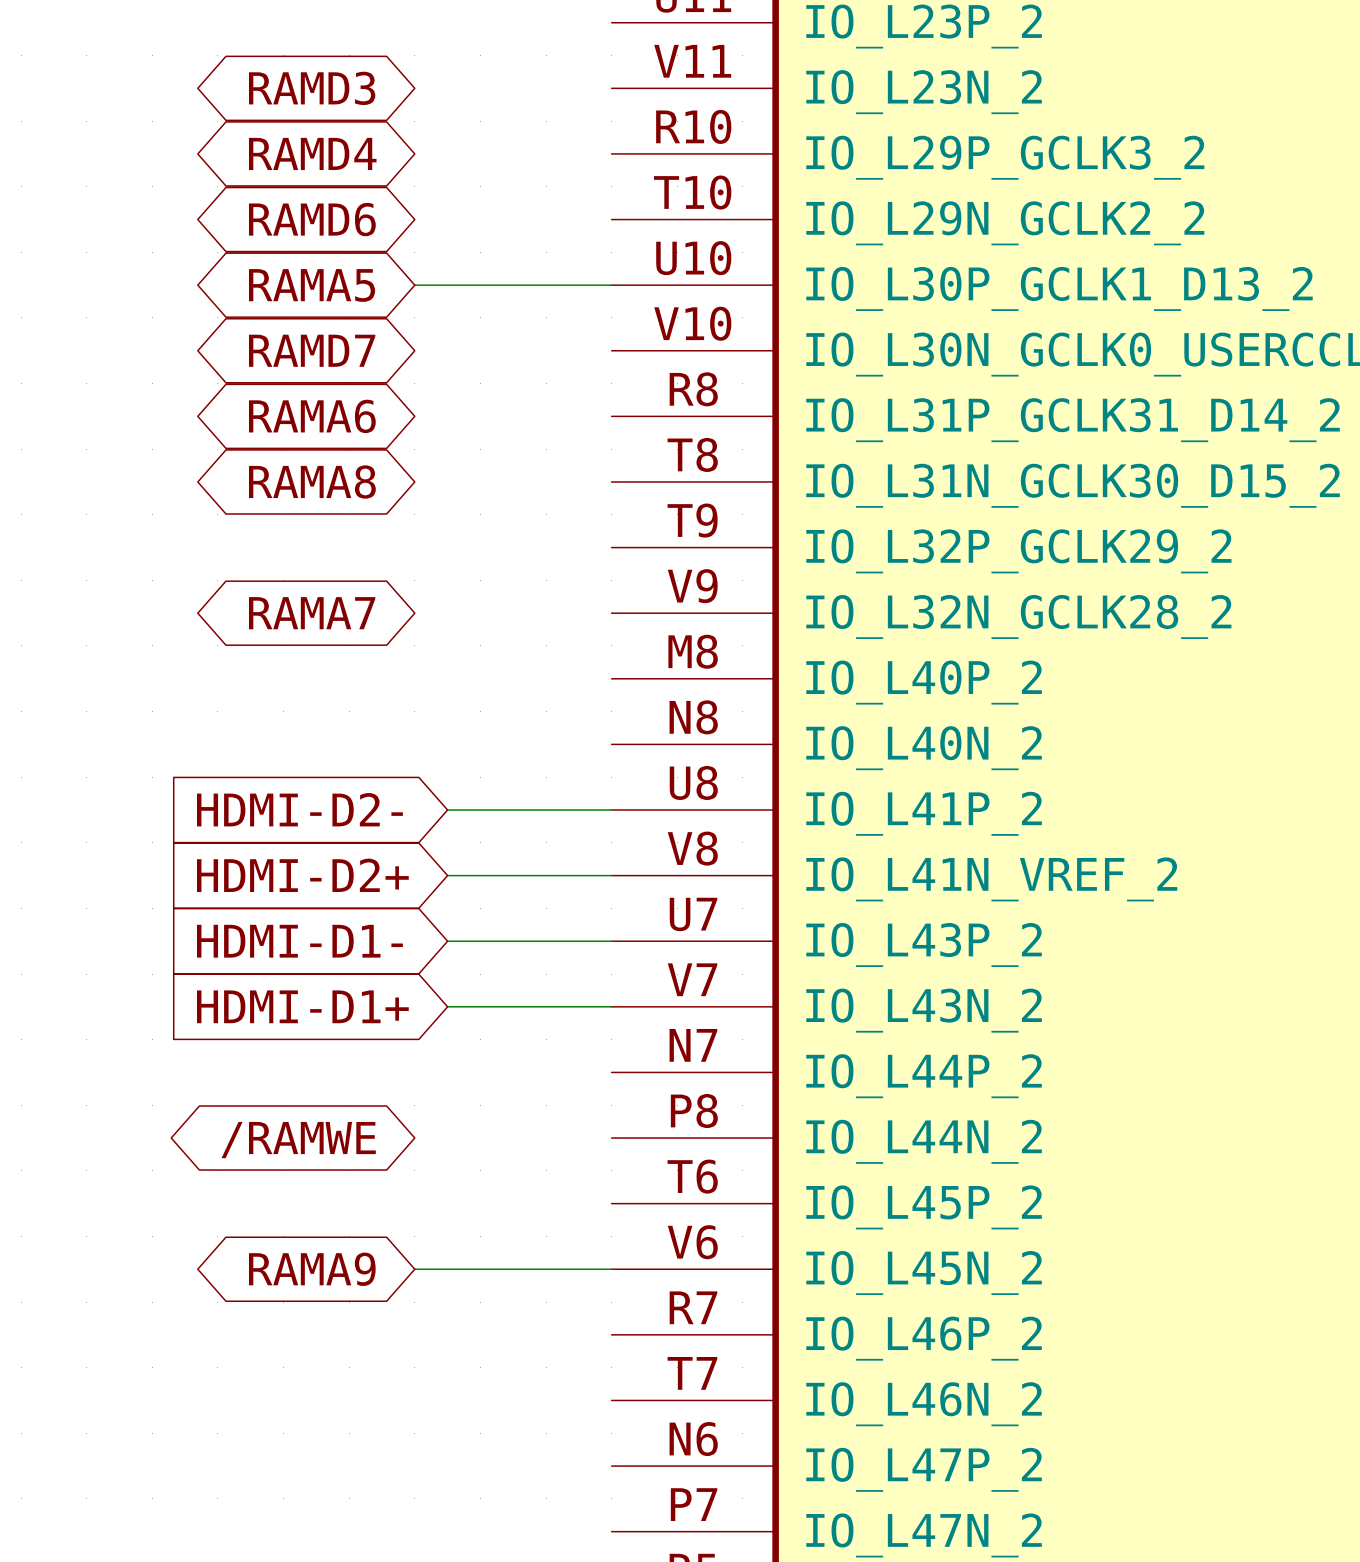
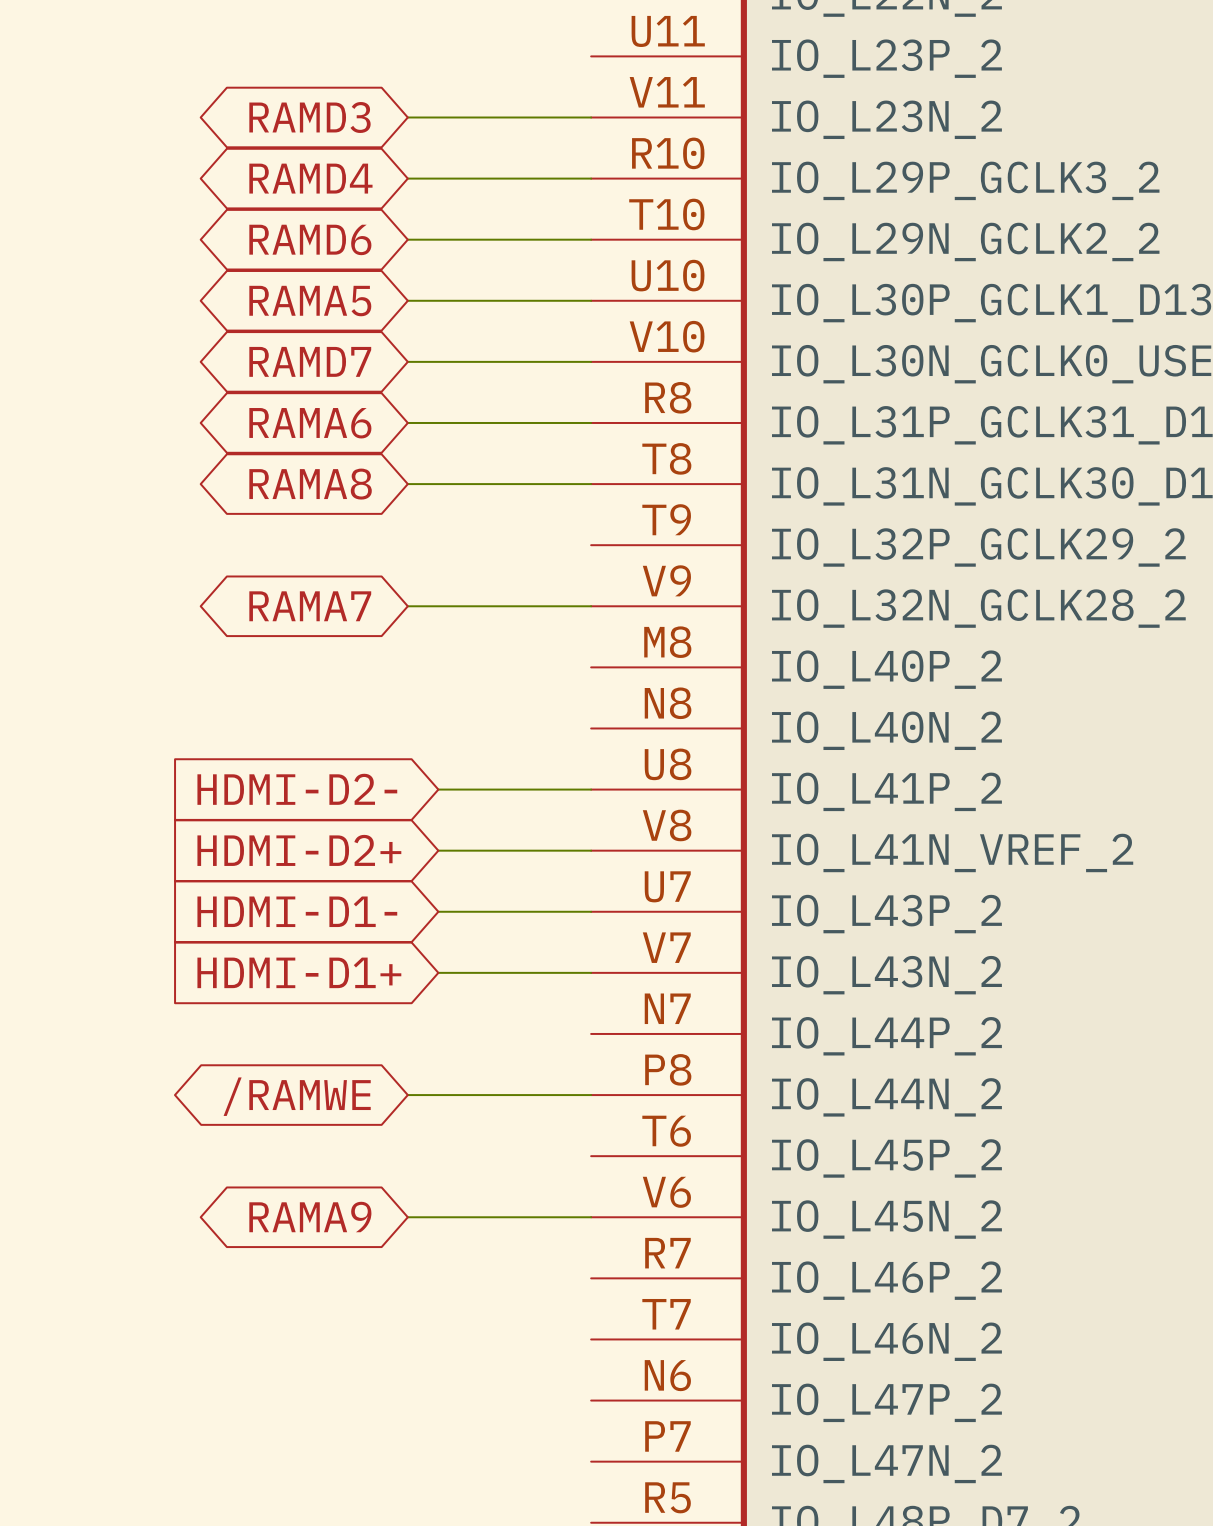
wire: none -> (407, 117) (591, 117)
wire: none -> (407, 178) (591, 178)
wire: none -> (407, 239) (591, 239)
wire: none -> (407, 361) (591, 361)
wire: none -> (407, 422) (591, 422)
wire: none -> (407, 484) (591, 484)
wire: none -> (407, 606) (591, 606)
wire: none -> (407, 1095) (591, 1095)

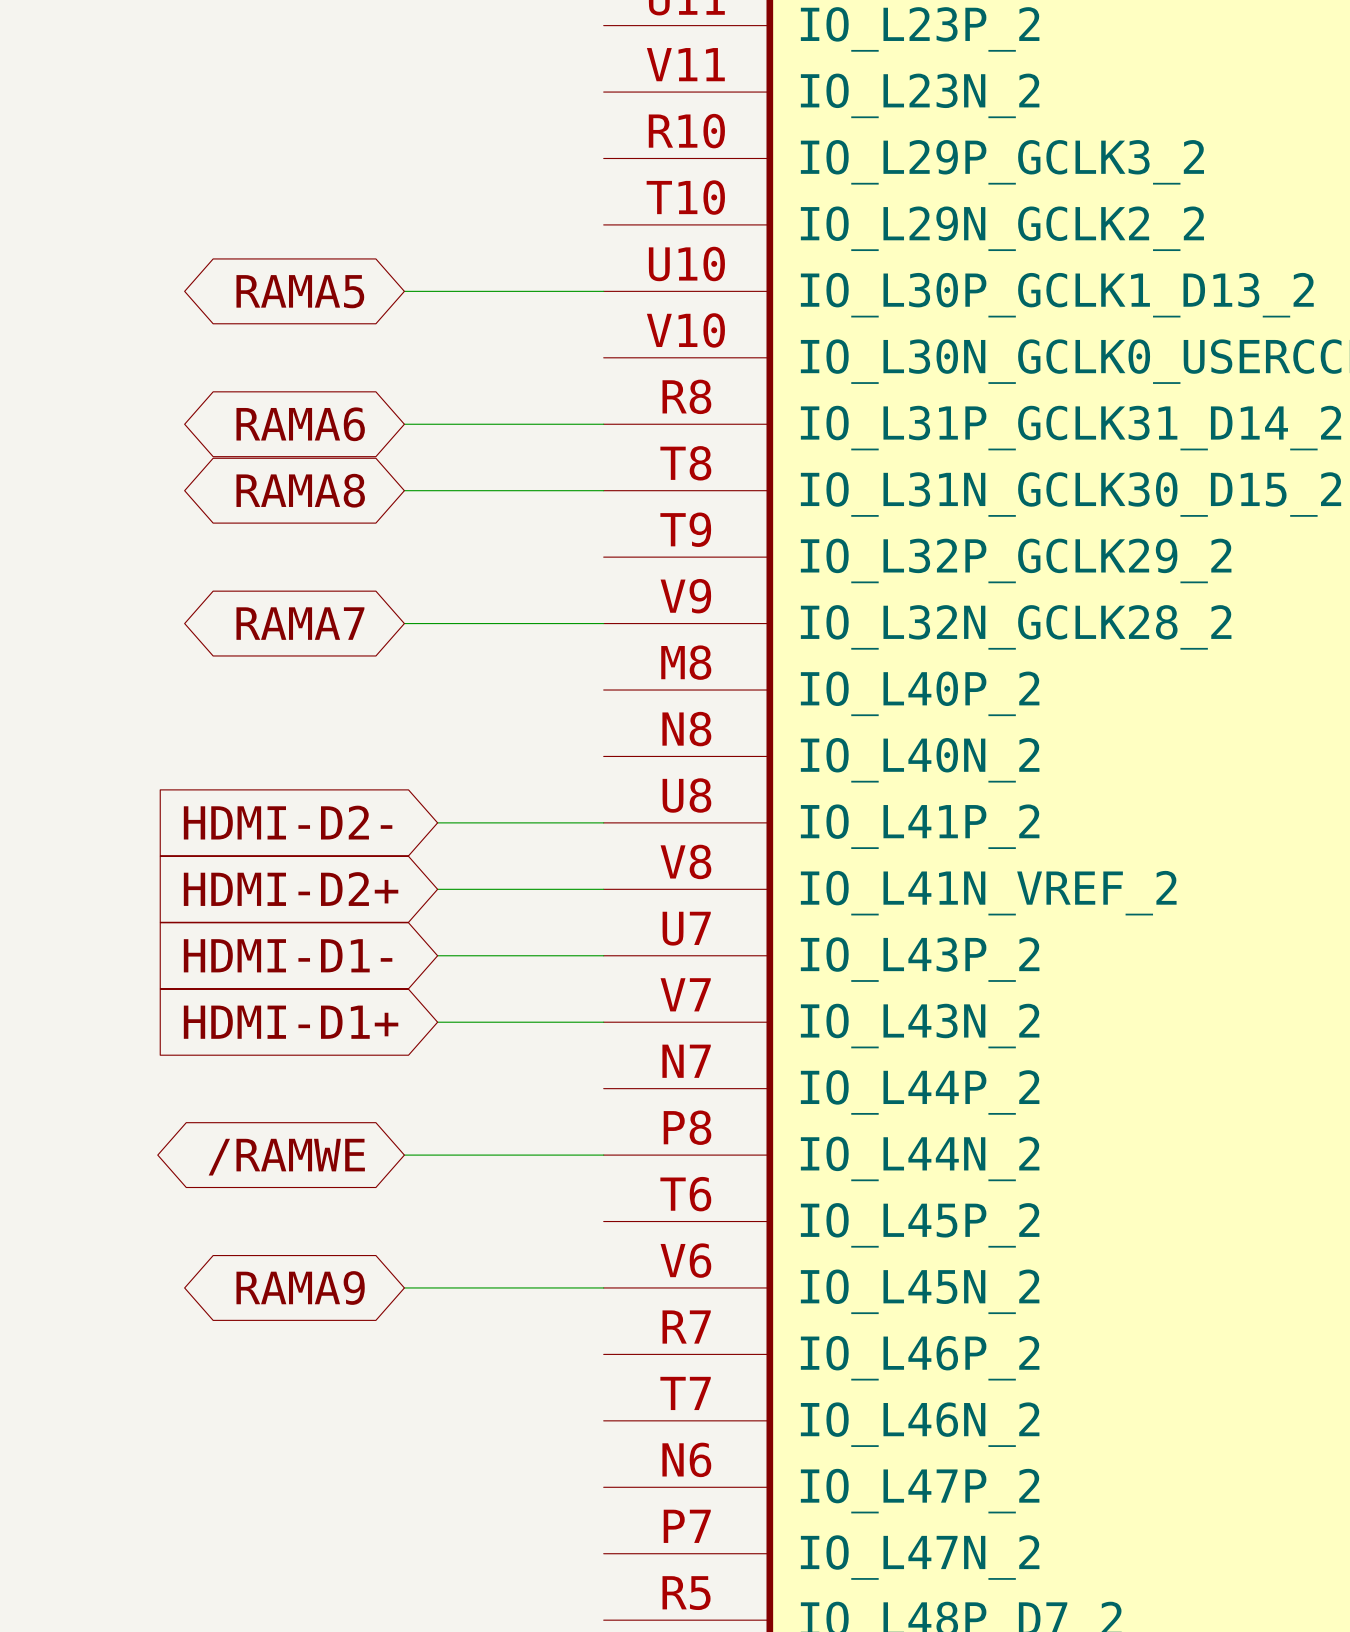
global label: RAMD3 (309, 117) -> none
wire: (407, 117) (591, 117) -> none
global label: RAMD4 (310, 178) -> none
wire: (407, 178) (591, 178) -> none
global label: RAMD6 (310, 239) -> none
wire: (407, 239) (591, 239) -> none
global label: RAMD7 (310, 361) -> none
wire: (407, 361) (591, 361) -> none

